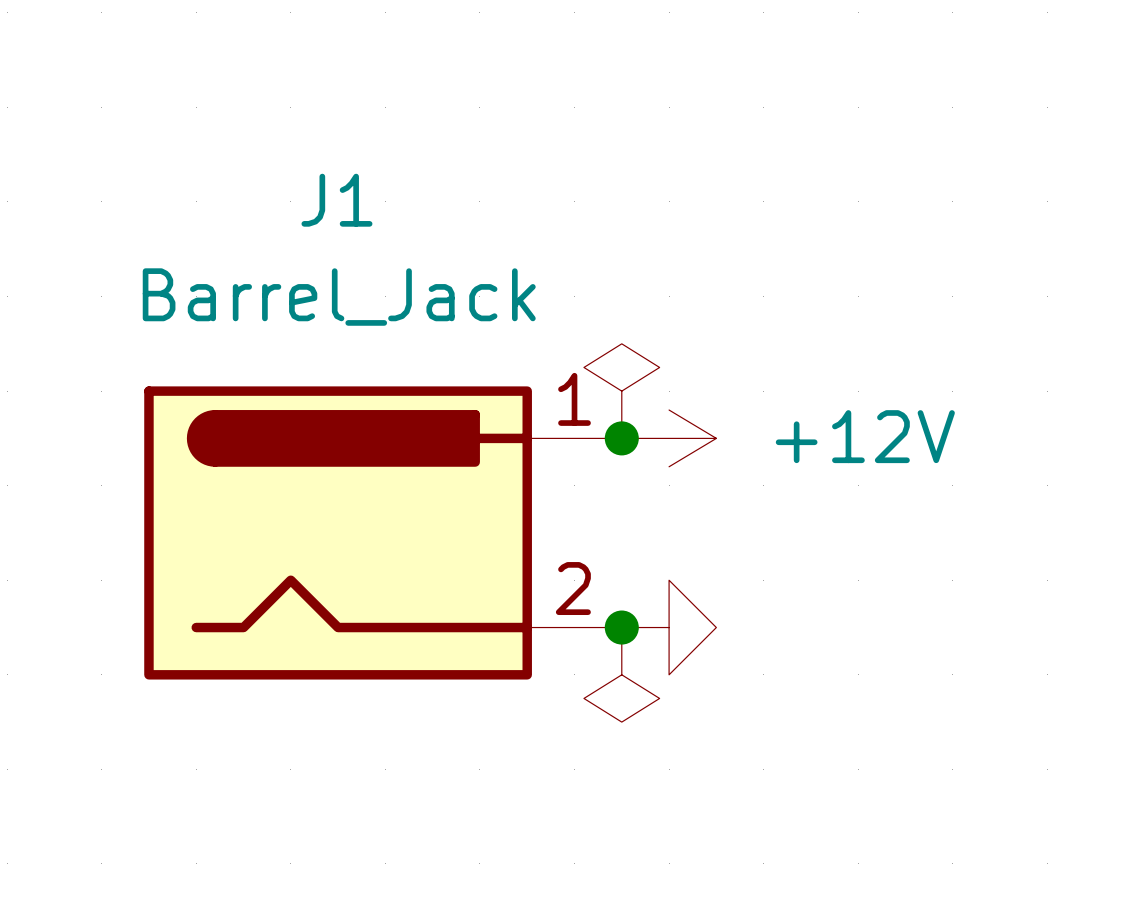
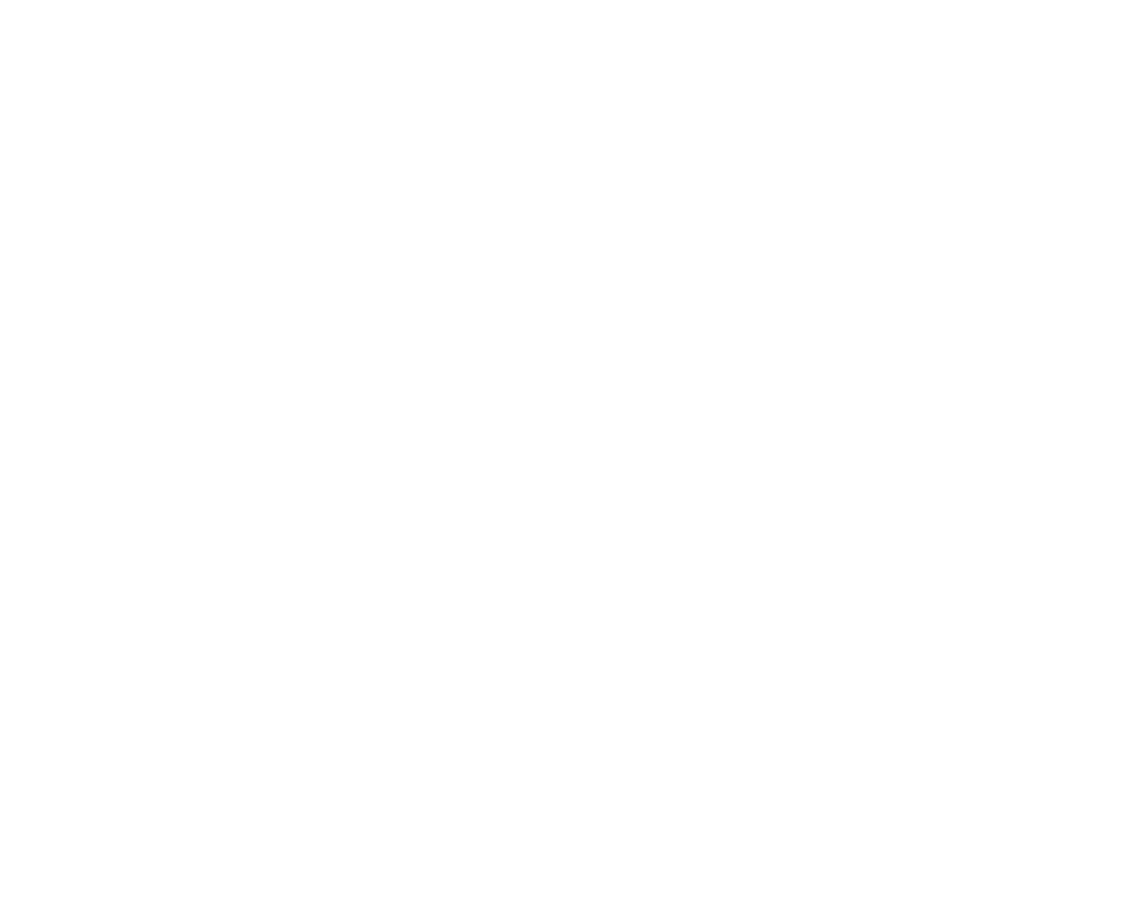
power symbol: (621, 391) -> none
junction: (621, 438) -> none
power symbol: +12V (669, 438) -> none
J1: Barrel_Jack (383, 532) -> none
junction: (621, 627) -> none
power symbol: (669, 627) -> none
power symbol: (621, 674) -> none

